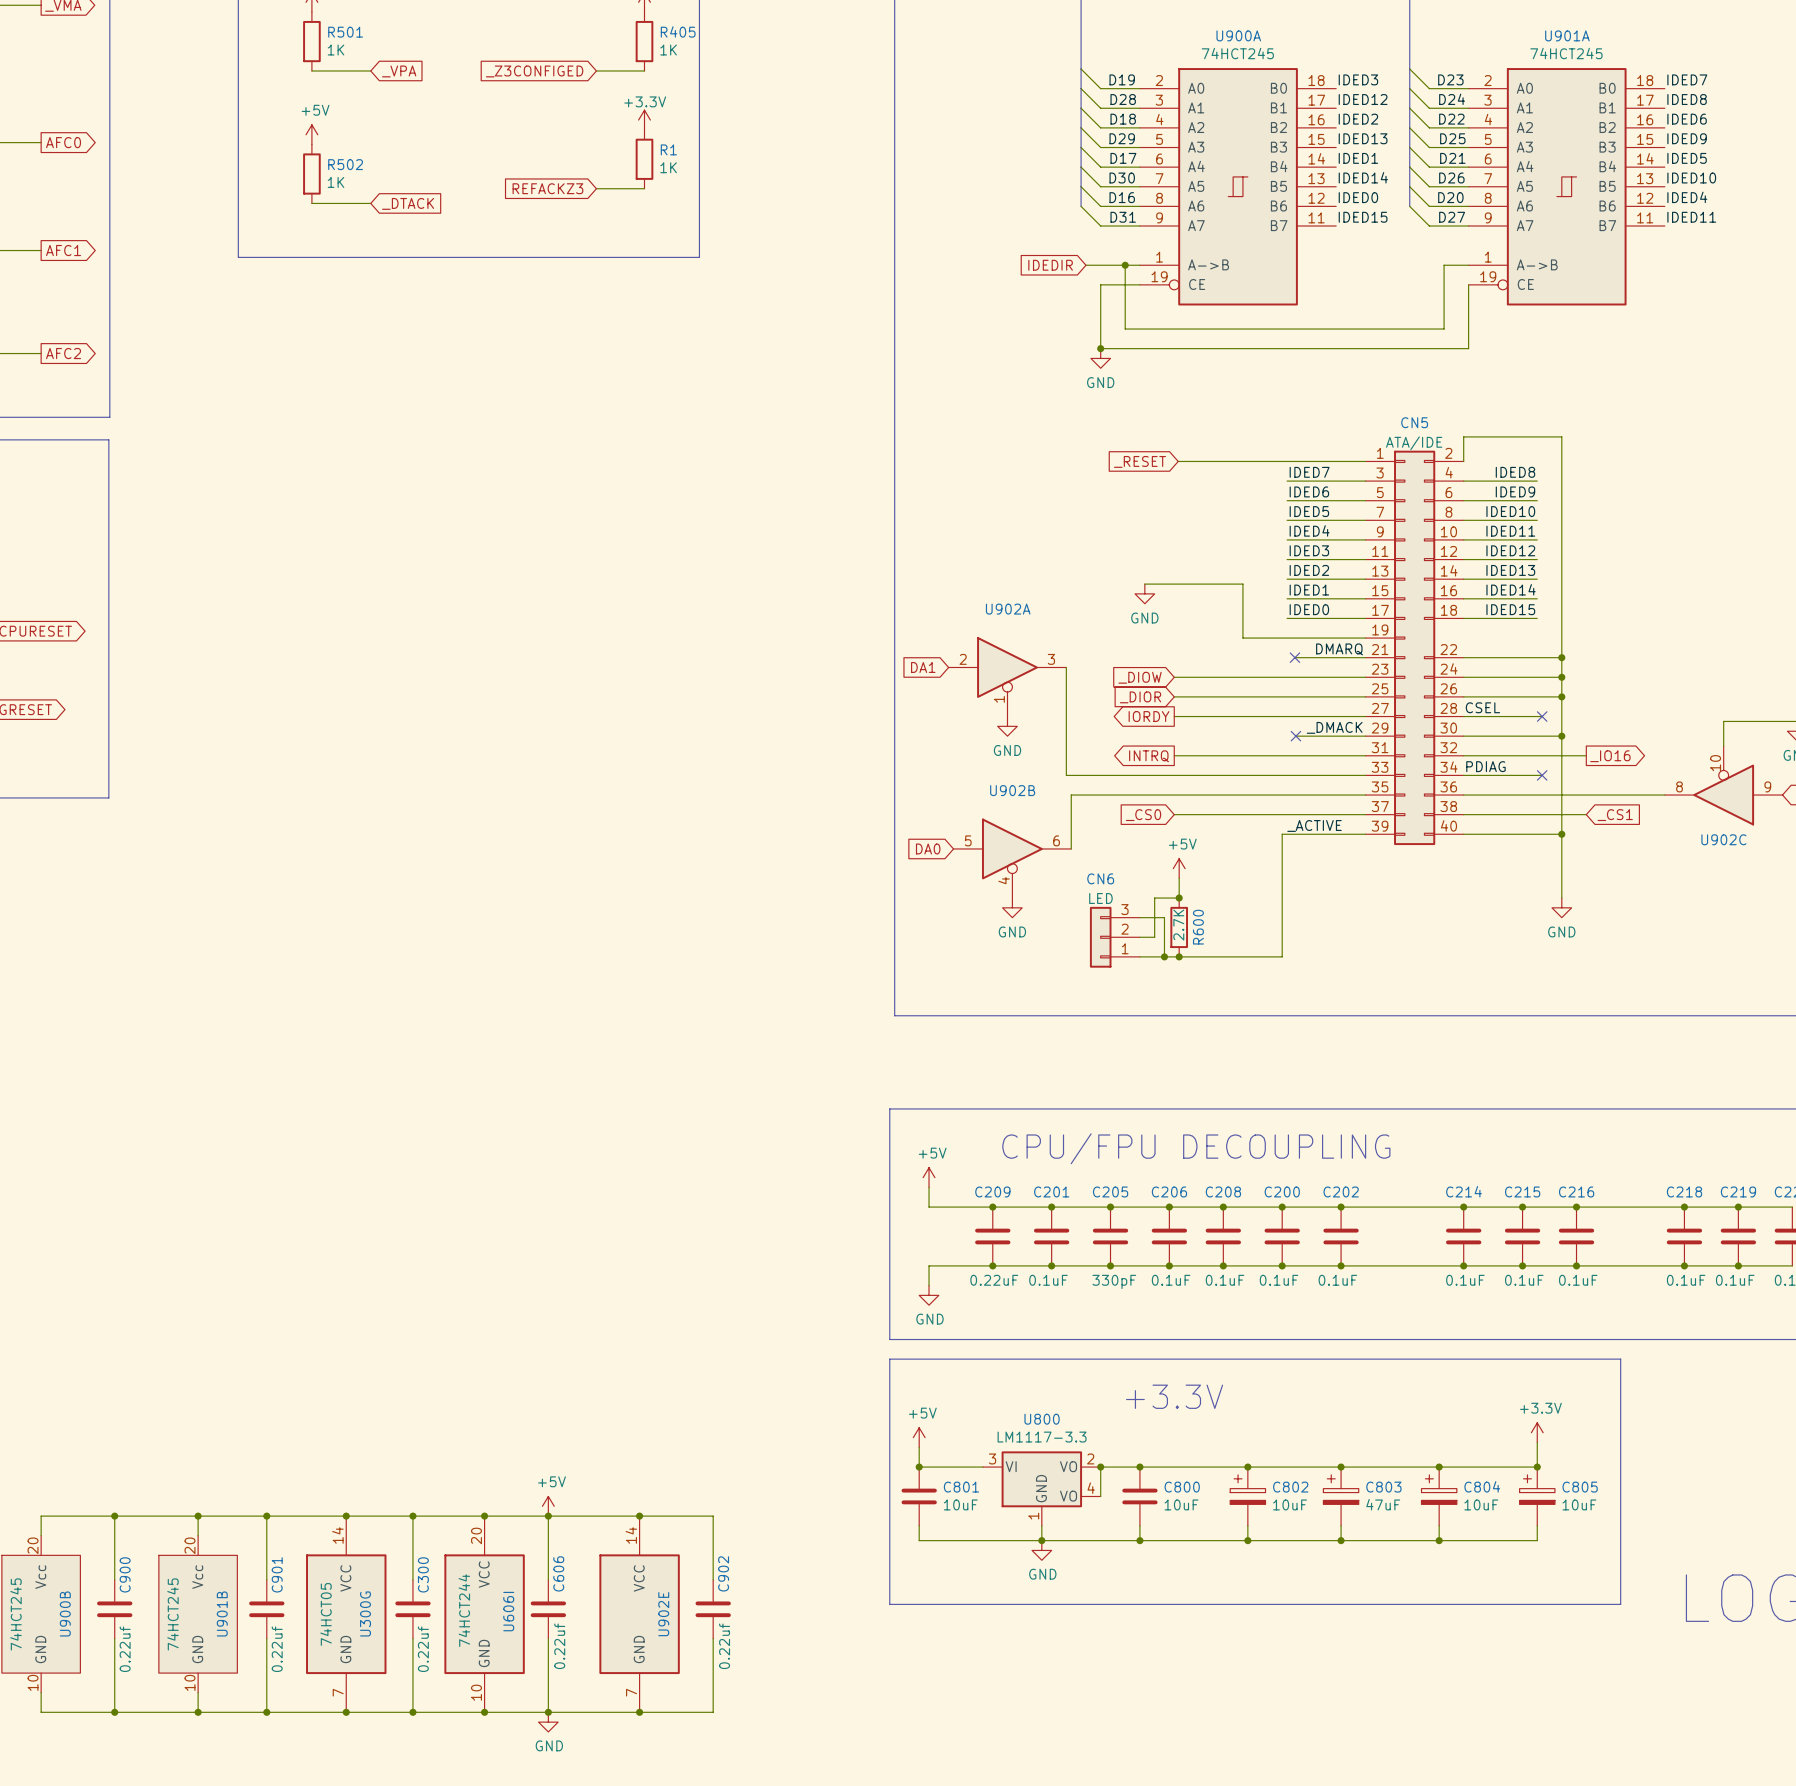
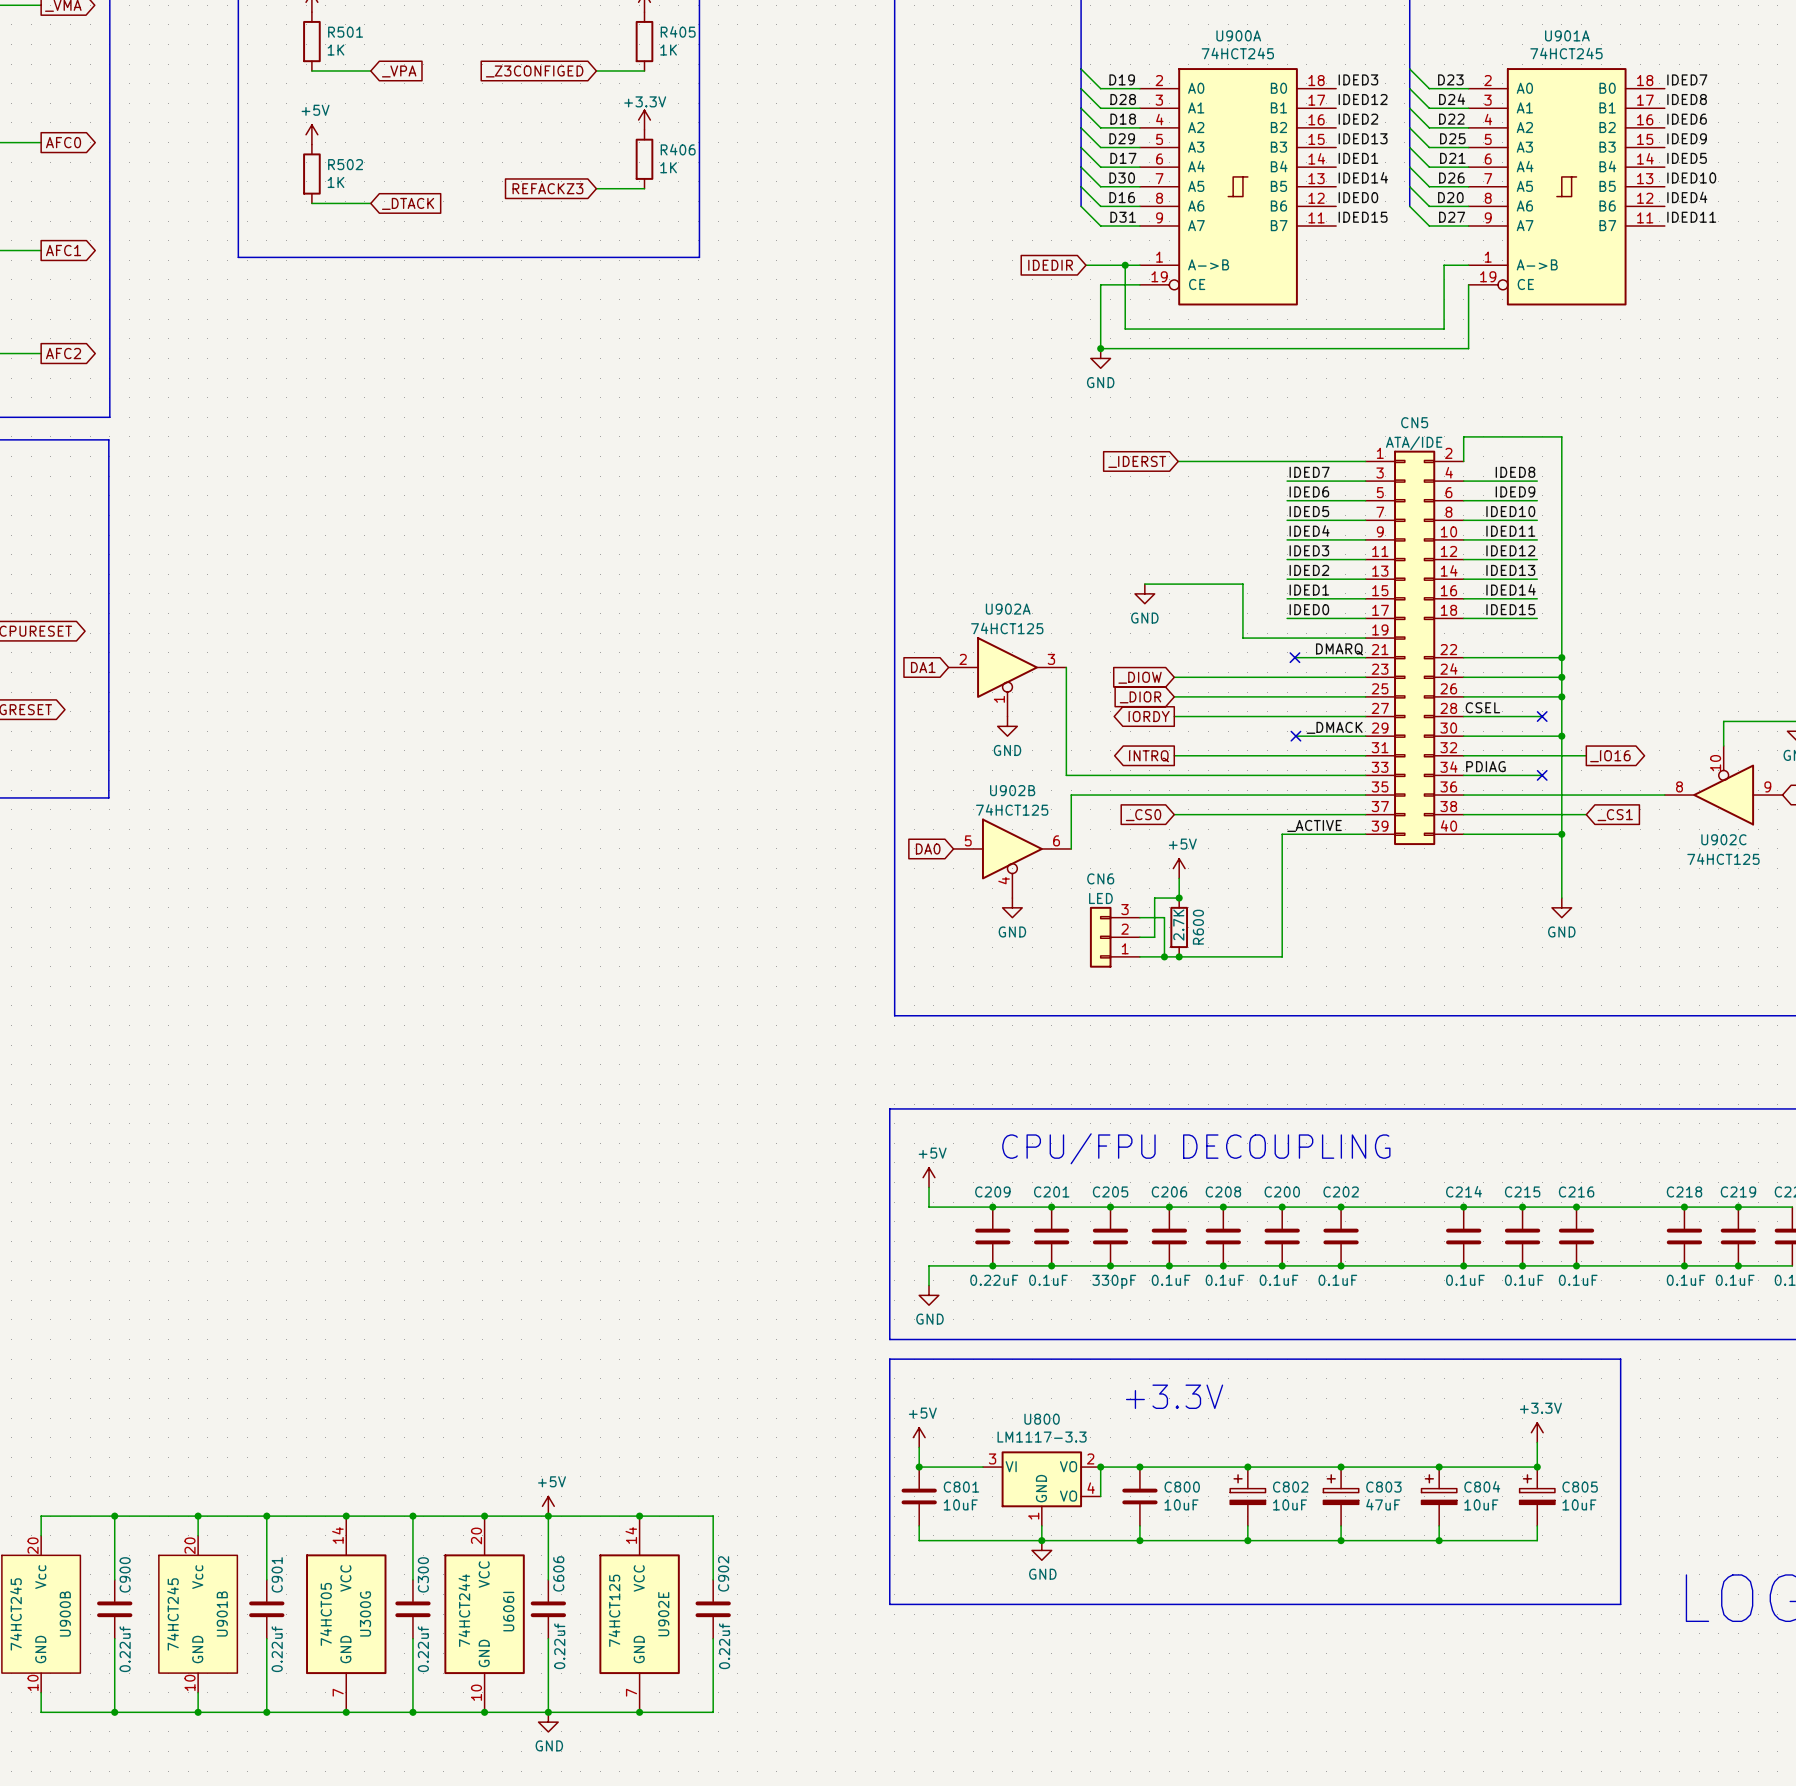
R1 name: R1 (668, 149) -> R406 (678, 149)
global label: _RESET (1139, 461) -> _IDERST (1137, 461)
U902A value: none -> 74HCT125 (1007, 628)
U902B value: none -> 74HCT125 (1012, 809)
U902C value: none -> 74HCT125 (1723, 859)
U902E value: none -> 74HCT125 (614, 1610)

